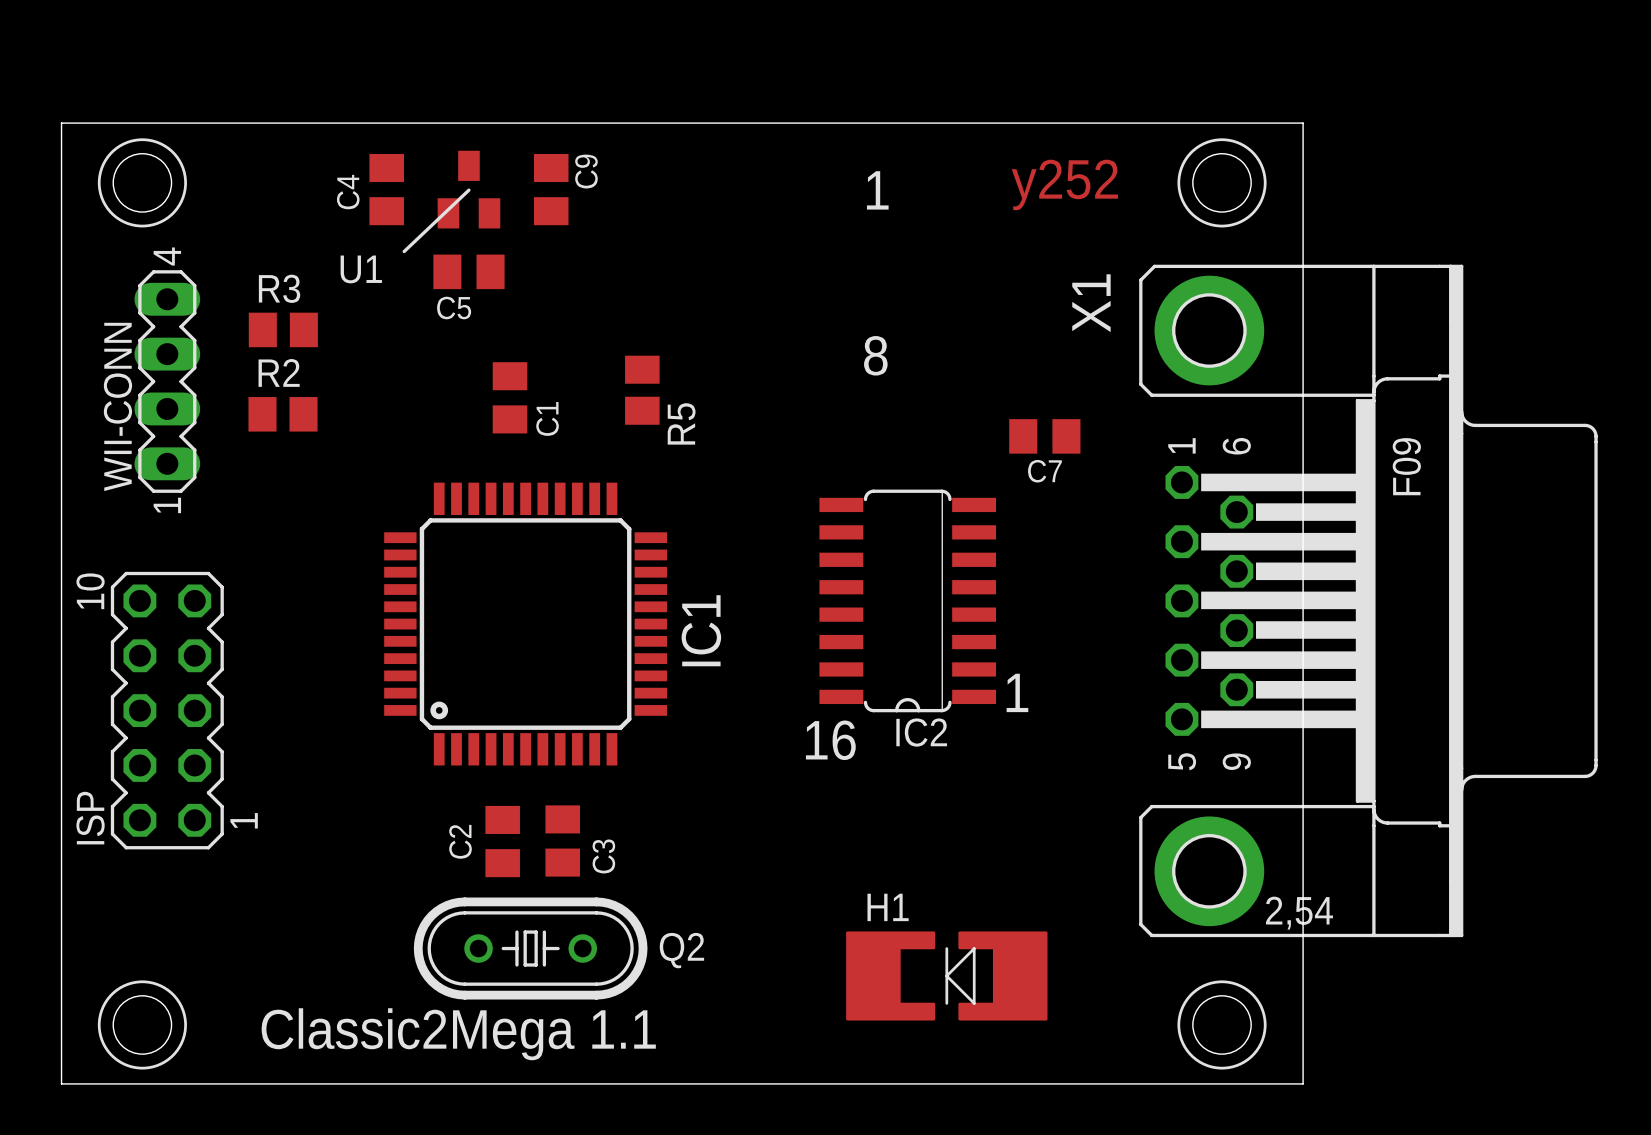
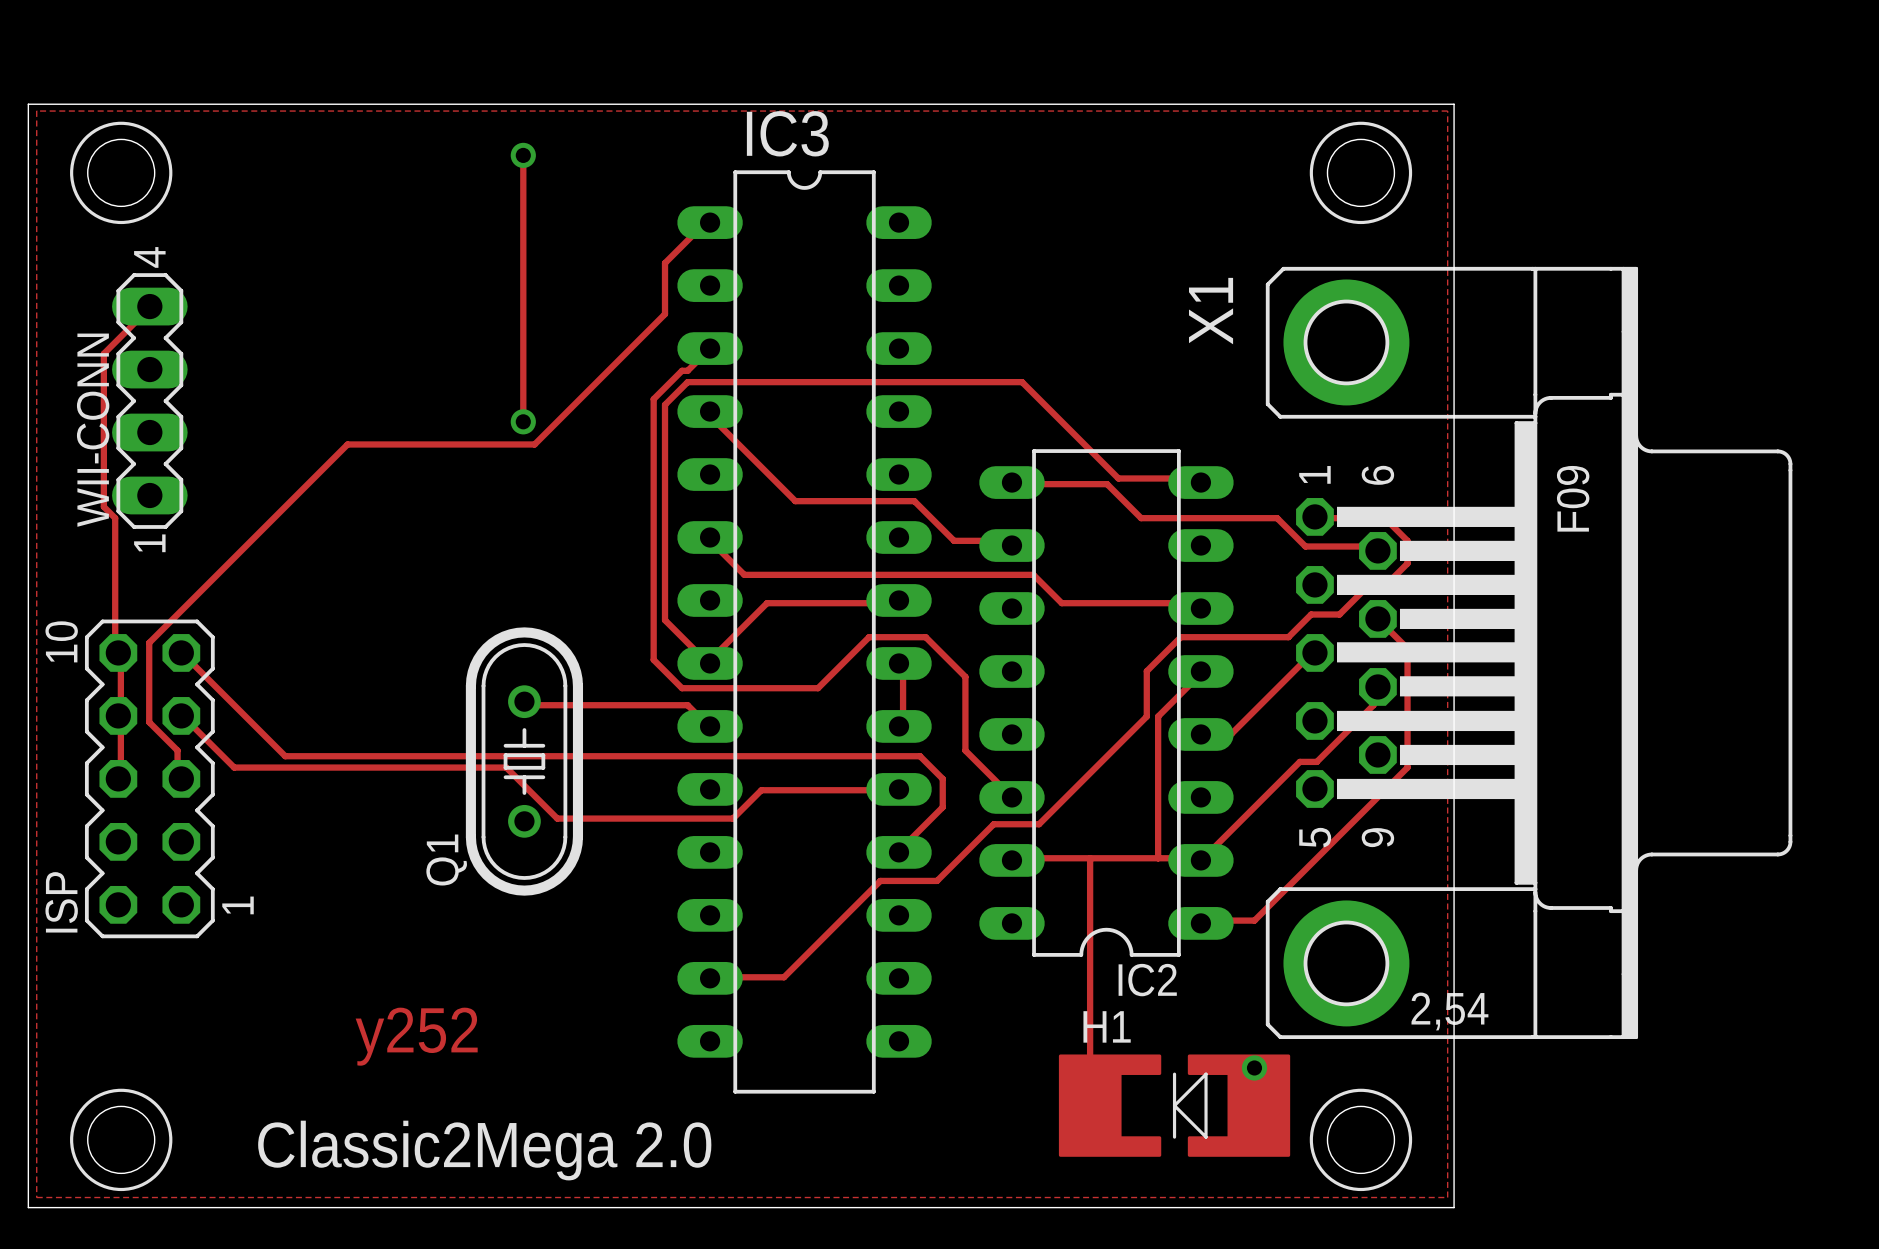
zone outline: none -> (36, 110) (36, 1197) (1447, 1197) (1447, 111) (37, 111)
track: none -> (523, 155) (523, 421)
via: none -> (523, 155)
text: y252 (1064, 184) -> none
C4: (386, 189) -> none
U1: (468, 189) -> none
C9: (551, 189) -> none
line: (468, 190) (404, 251) -> none
text: 1 (877, 190) -> none
track: none -> (710, 222) (704, 223) (665, 263) (665, 314) (534, 444) (347, 444) (149, 642) (149, 722) (177, 750) (177, 778) (181, 778)
C5: (468, 271) -> none
track: none -> (149, 306) (103, 353) (103, 506) (115, 518) (115, 648) (120, 654) (120, 710) (118, 715) (120, 716) (120, 778) (118, 778)
R3: (283, 329) -> none
track: none -> (710, 348) (687, 370) (682, 370) (653, 399) (653, 659) (682, 688) (818, 688) (869, 637) (925, 637) (965, 676) (965, 750) (1011, 797)
text: 8 (875, 355) -> none
R5: (642, 390) -> none
track: none -> (710, 411) (710, 416) (795, 501) (914, 501) (954, 540) (1010, 540) (1011, 545)
C1: (510, 397) -> none
via: none -> (523, 421)
R2: (283, 414) -> none
C7: (1044, 436) -> none
track: none -> (1011, 482) (1016, 484) (1107, 484) (1141, 518) (1277, 518) (1305, 546) (1373, 546) (1377, 550)
track: none -> (1200, 482) (1197, 478) (1118, 478) (1022, 382) (687, 382) (665, 404) (665, 620) (704, 659) (710, 663) (710, 659) (767, 603) (897, 603) (899, 600)
track: none -> (1314, 516) (1384, 518) (1407, 540) (1407, 563) (1390, 580) (1373, 580) (1339, 614) (1311, 614) (1288, 637) (1180, 637) (1146, 671) (1146, 716) (1039, 824) (993, 824) (937, 880) (880, 880) (784, 977) (710, 978)
IC2 footprint: [819, 489, 997, 713] -> [979, 449, 1234, 957]
track: none -> (710, 537) (710, 540) (744, 574) (1033, 574) (1061, 603) (1197, 603) (1200, 608)
track: none -> (1377, 618) (1407, 648) (1407, 767) (1254, 920) (1203, 920) (1200, 923)
IC3: none -> (804, 631)
track: none -> (181, 652) (285, 756) (920, 756) (942, 778) (942, 807) (899, 852)
track: none -> (1314, 652) (1311, 654) (1231, 733) (1200, 734)
track: none -> (899, 663) (903, 665) (903, 722) (899, 726)
track: none -> (1200, 671) (1158, 716) (1158, 858)
IC1: (525, 624) -> none
track: none -> (1377, 686) (1373, 688) (1373, 705) (1316, 761) (1299, 761) (1200, 860) (1197, 858) (1016, 858) (1011, 860)
track: none -> (524, 701) (528, 705) (687, 705) (710, 726)
track: none -> (181, 715) (234, 767) (506, 767) (557, 818) (733, 818) (761, 790) (899, 789)
text: 1 (1017, 692) -> none
Q1: none -> (524, 761)
IC2 name position: IC2 (921, 732) -> IC2 (1147, 980)
text: 16 (830, 740) -> none
track: none -> (1090, 858) (1090, 1105)
C2: (502, 841) -> none
C3: (562, 841) -> none
text: none -> y252 (416, 1036)
Q2: (530, 948) -> none
via: none -> (1254, 1067)
H1 position: (946, 975) -> (1174, 1105)
text: Classic2Mega 1.1 (458, 1034) -> Classic2Mega 2.0 (484, 1150)

